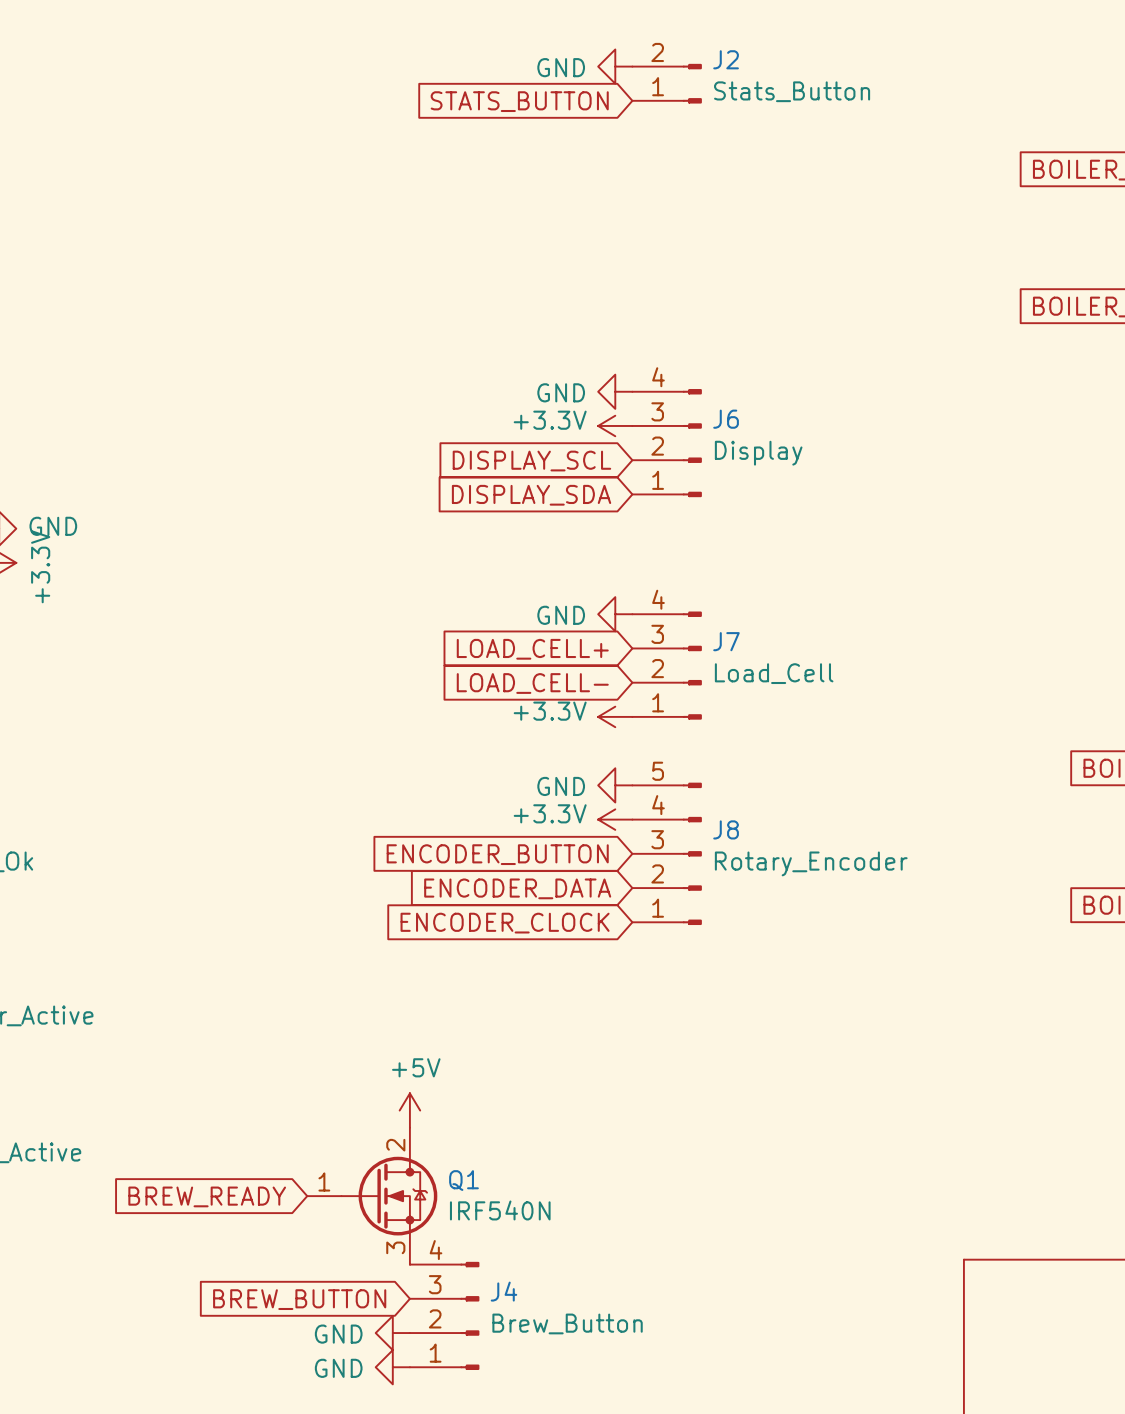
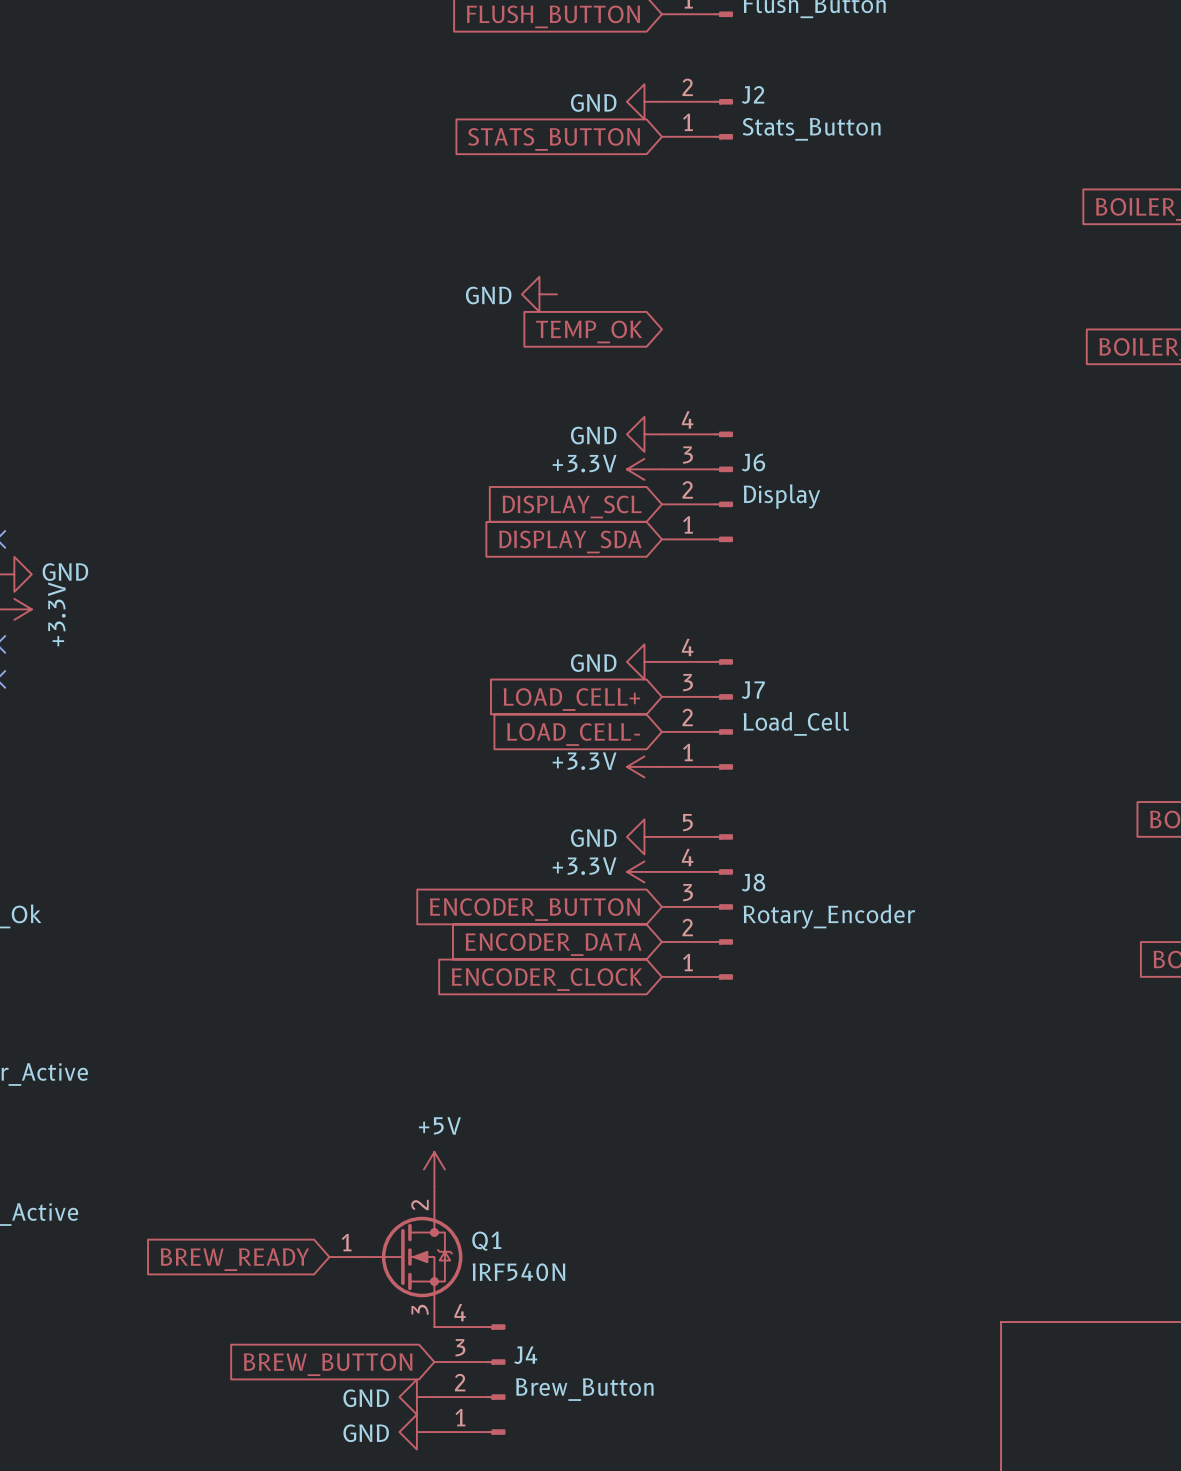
power symbol: none -> GND (539, 294)
global label: none -> TEMP_OK (589, 331)

